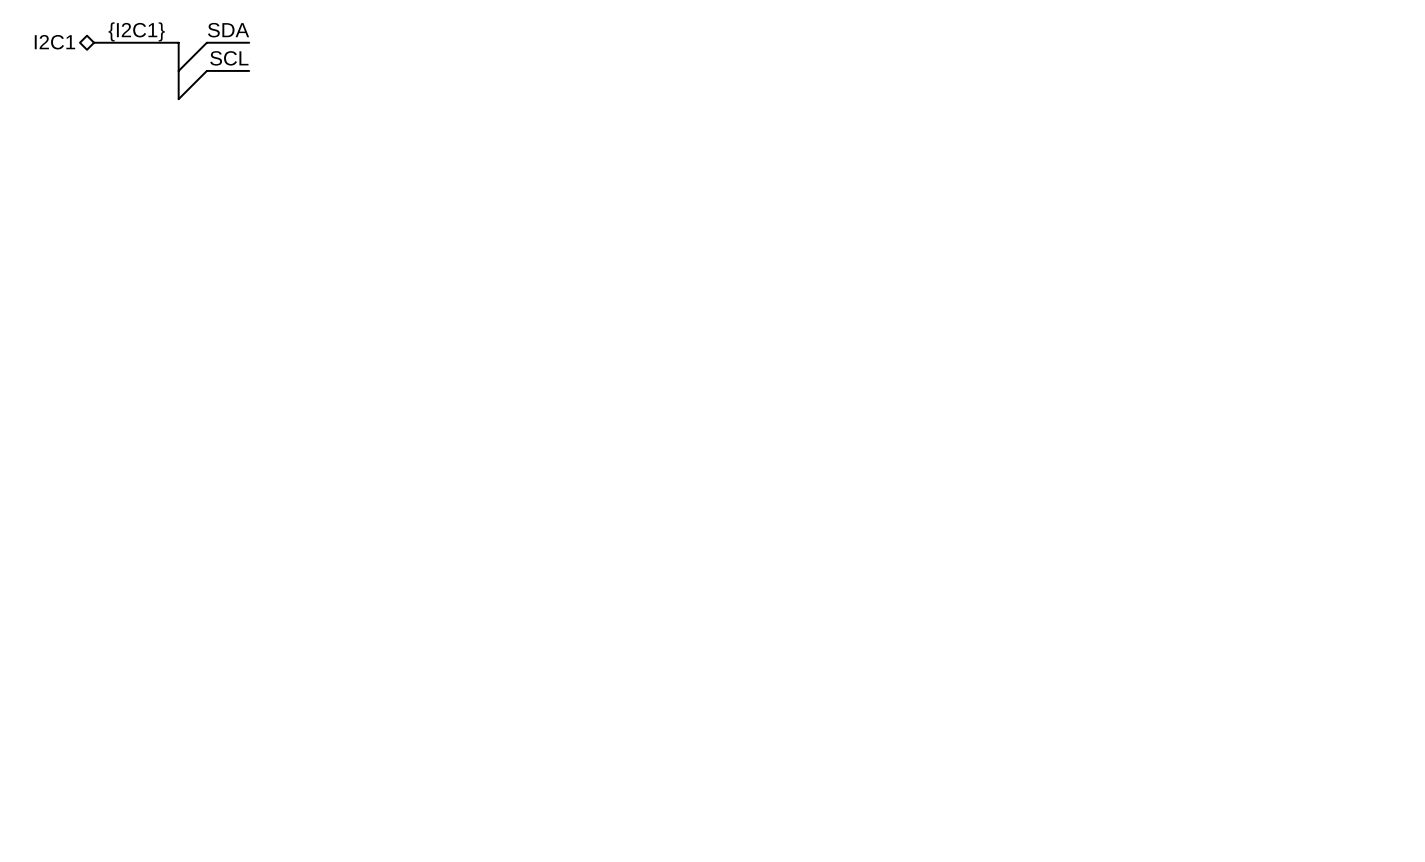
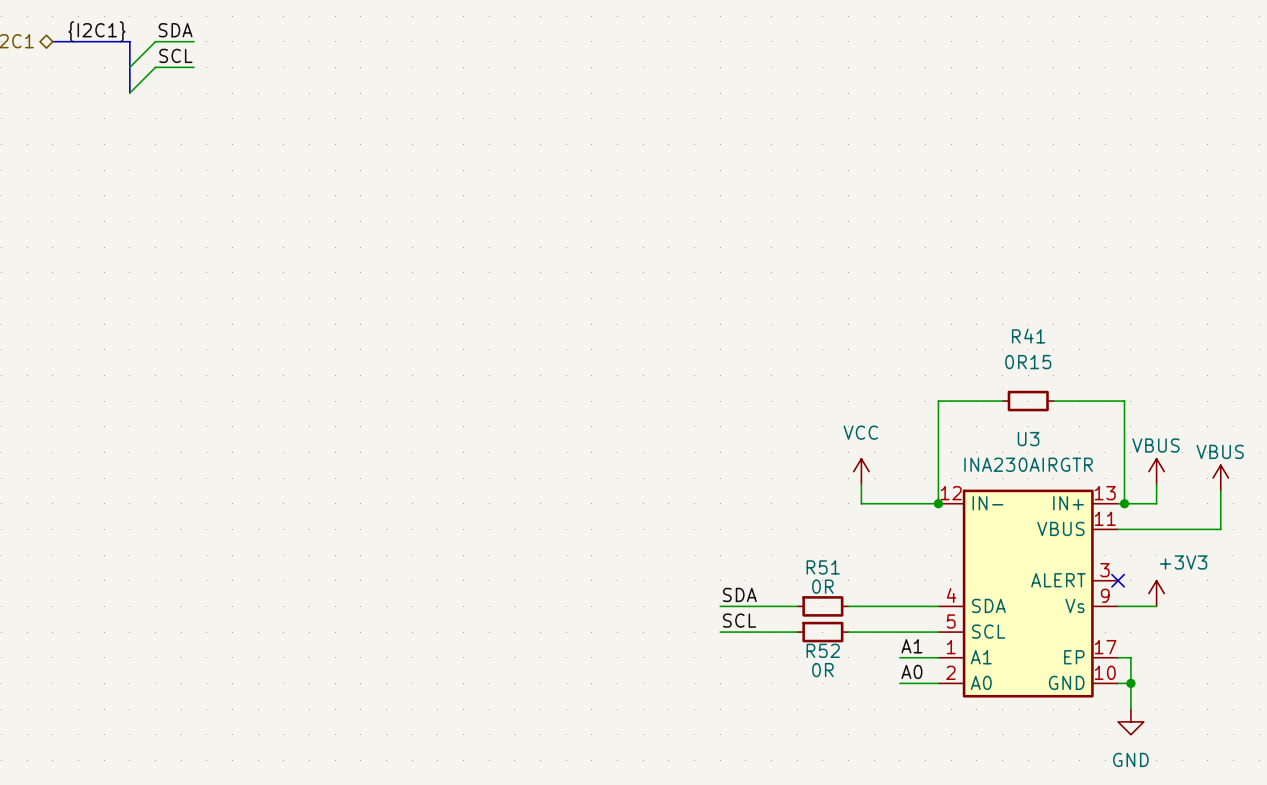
wire: none -> (1002, 401) (938, 401) (938, 503) (861, 503) (861, 484)
R41: none -> (1028, 401)
wire: none -> (1053, 401) (1124, 401) (1124, 503)
power symbol: none -> VCC (861, 471)
power symbol: none -> VBUS (1156, 471)
power symbol: none -> VBUS (1220, 478)
wire: none -> (1156, 484) (1156, 503) (1118, 503)
wire: none -> (1220, 490) (1220, 529) (1118, 529)
junction: none -> (938, 503)
junction: none -> (1124, 503)
no-connect mark: none -> (1118, 580)
U3: none -> INA230AIRGTR (1028, 593)
power symbol: none -> +3V3 (1156, 593)
label: none -> SDA (739, 594)
wire: none -> (720, 606) (797, 606)
R51: none -> (822, 606)
wire: none -> (848, 606) (938, 606)
wire: none -> (1118, 606) (1156, 606)
label: none -> SCL (739, 620)
wire: none -> (720, 632) (797, 632)
R52: none -> (822, 632)
wire: none -> (848, 632) (938, 632)
label: none -> A1 (911, 646)
wire: none -> (899, 657) (938, 657)
wire: none -> (1118, 657) (1130, 657) (1130, 709)
label: none -> A0 (911, 671)
wire: none -> (899, 683) (938, 683)
wire: none -> (1118, 683) (1130, 683)
junction: none -> (1130, 683)
power symbol: none -> GND (1130, 721)

